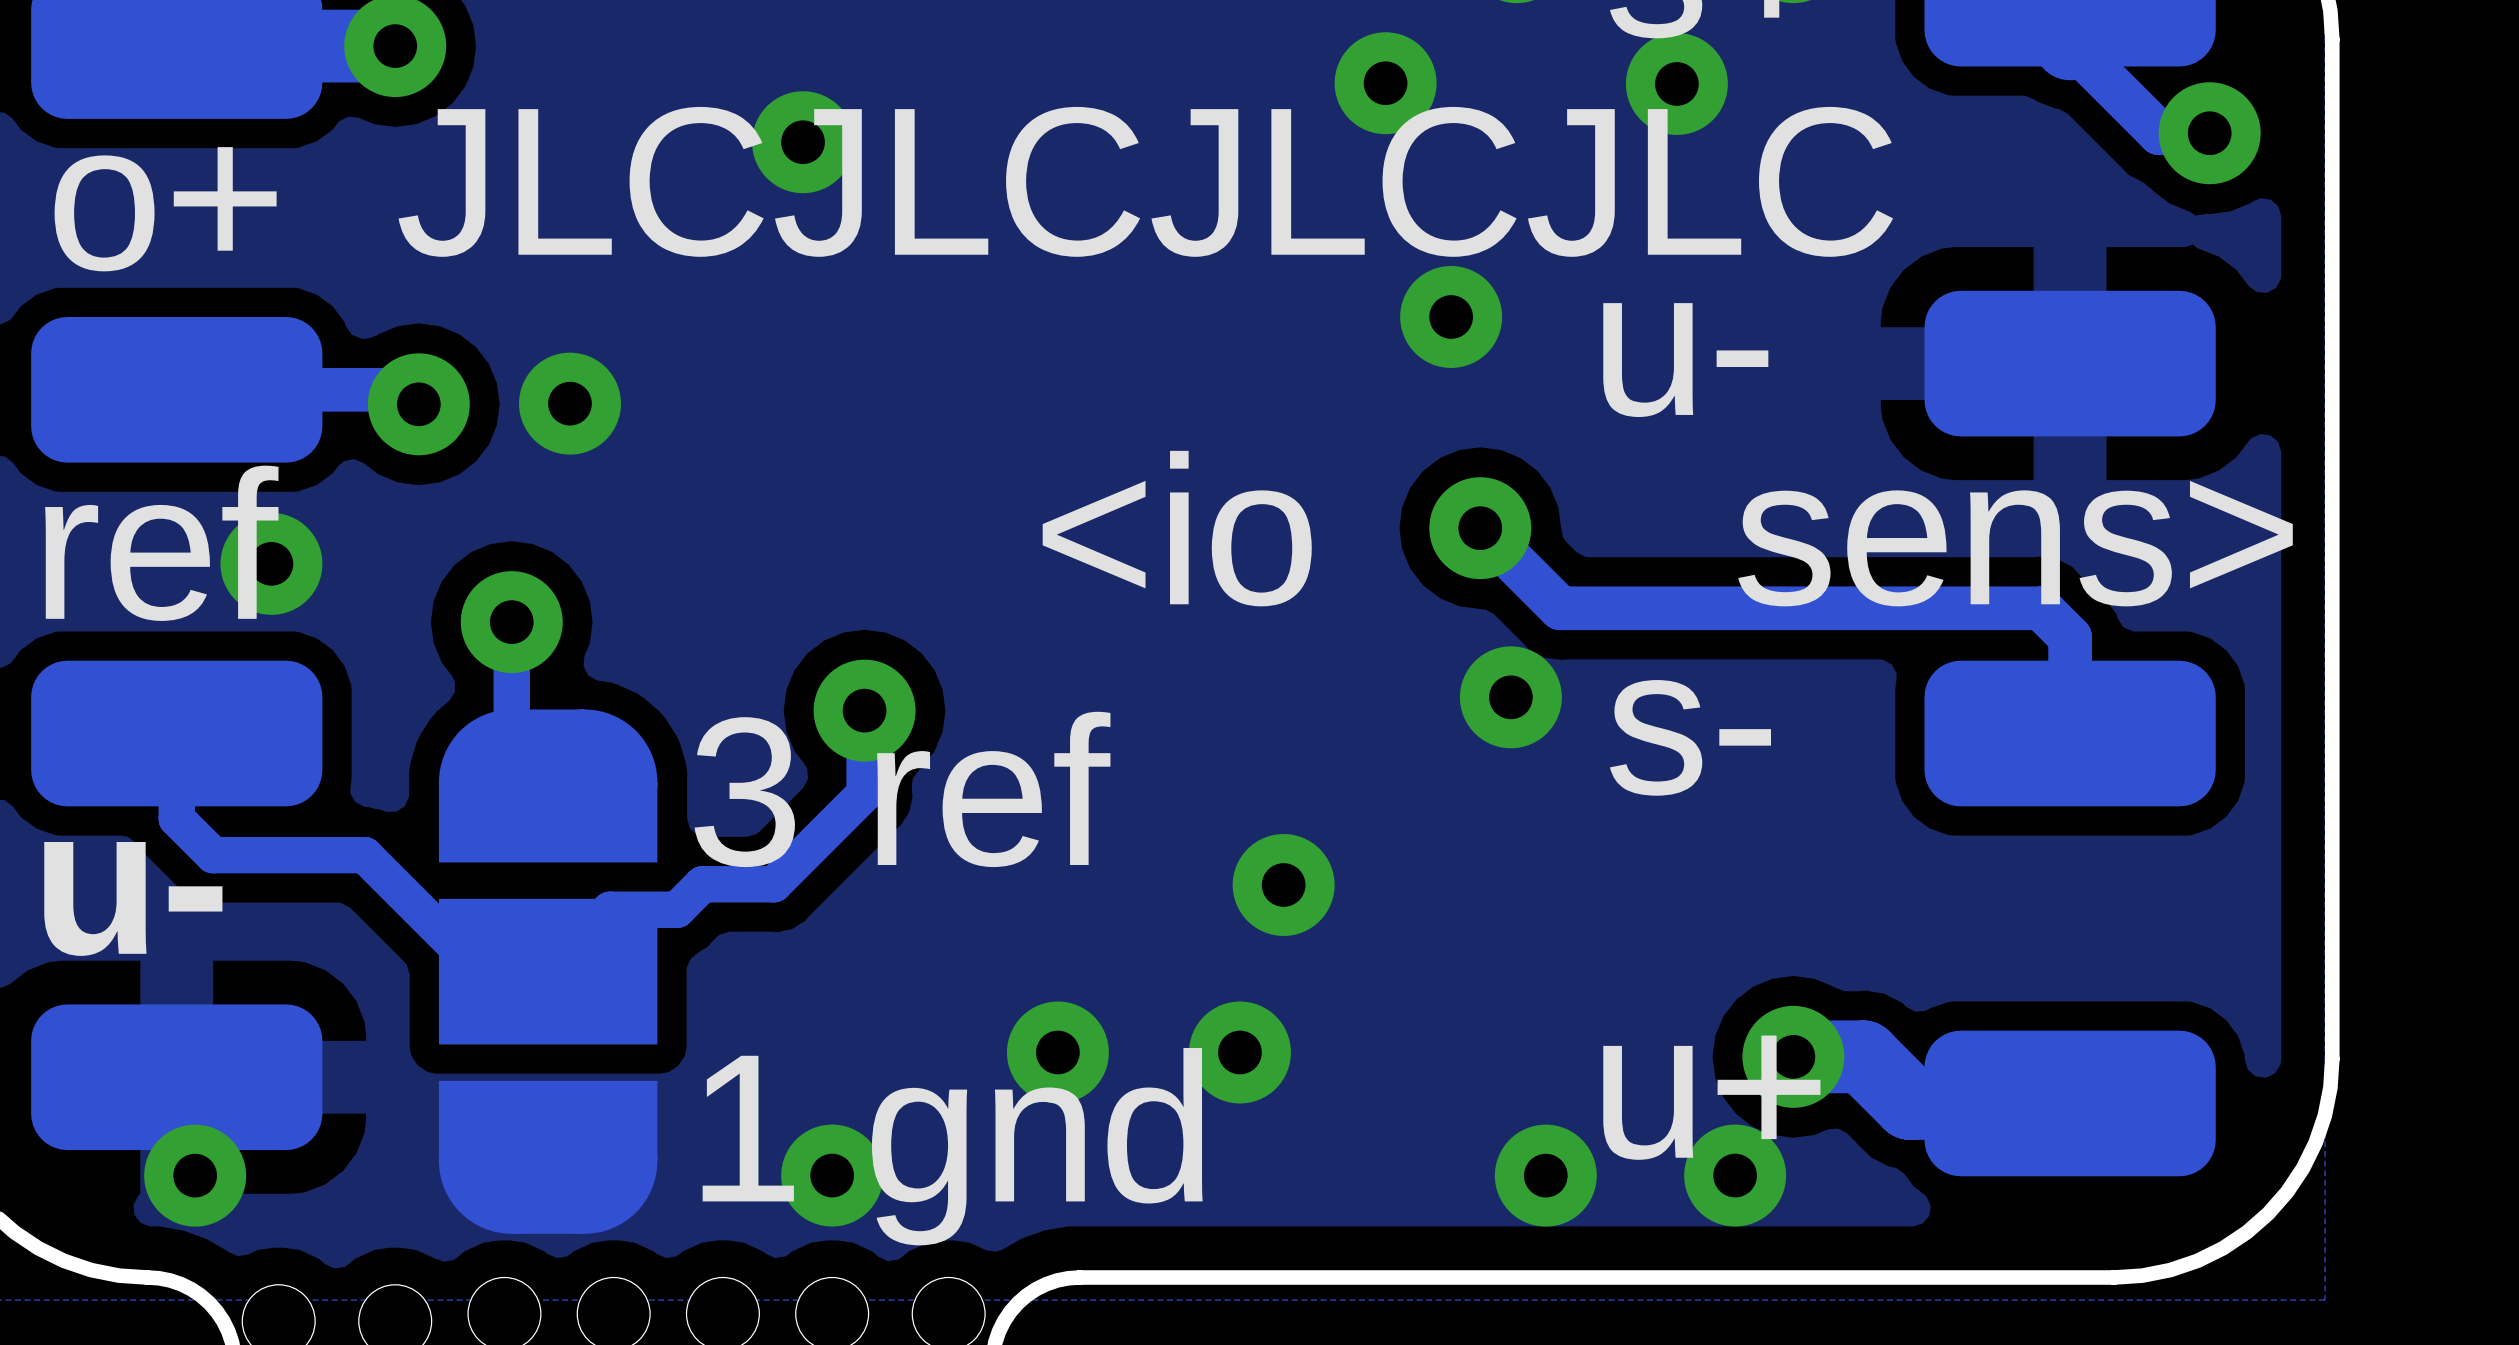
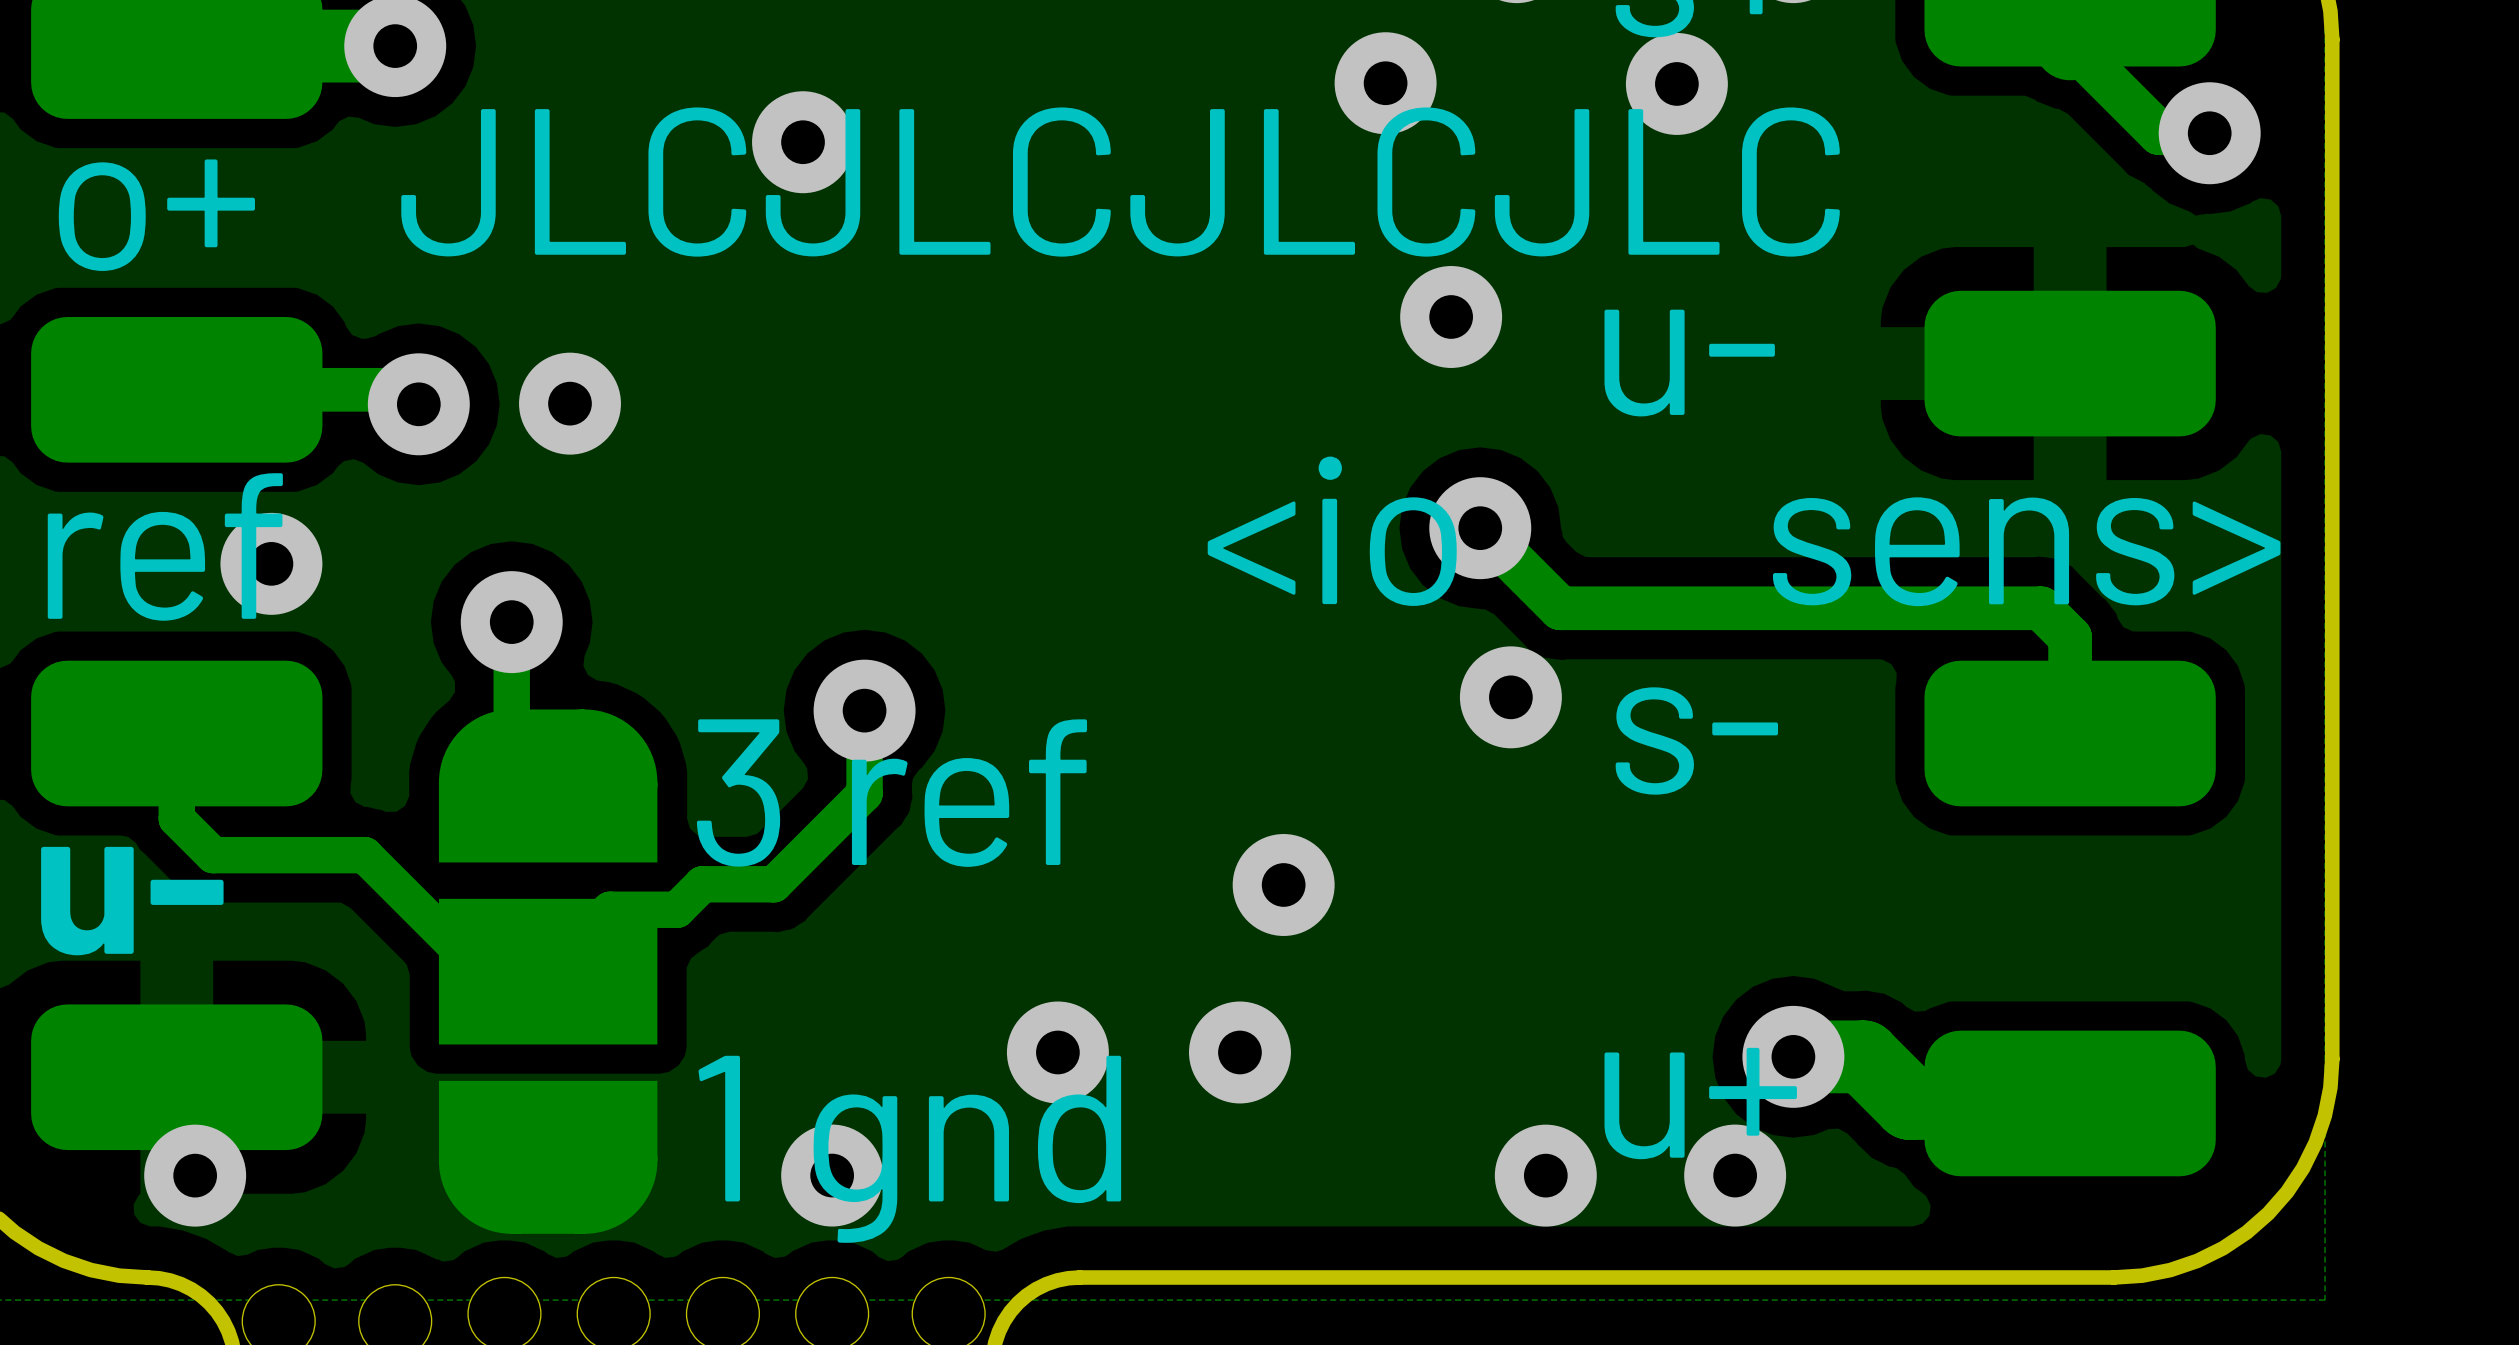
text position: <io sens> (1667, 528) -> <io sens> (1744, 531)

